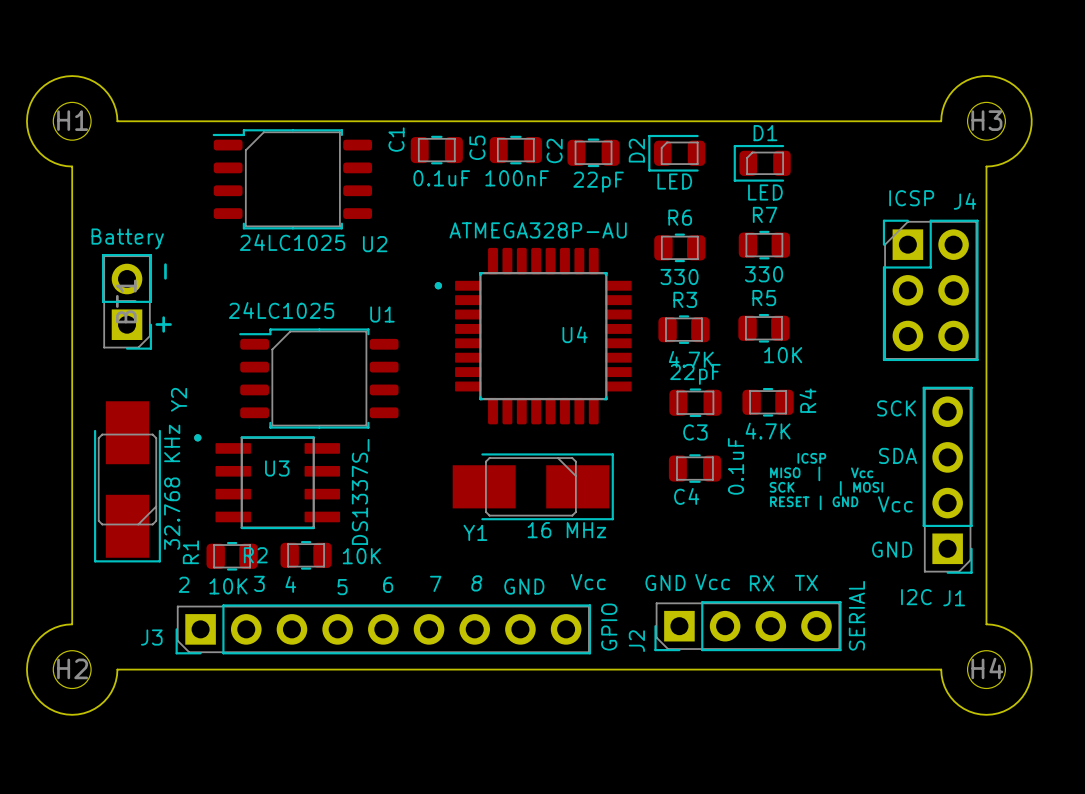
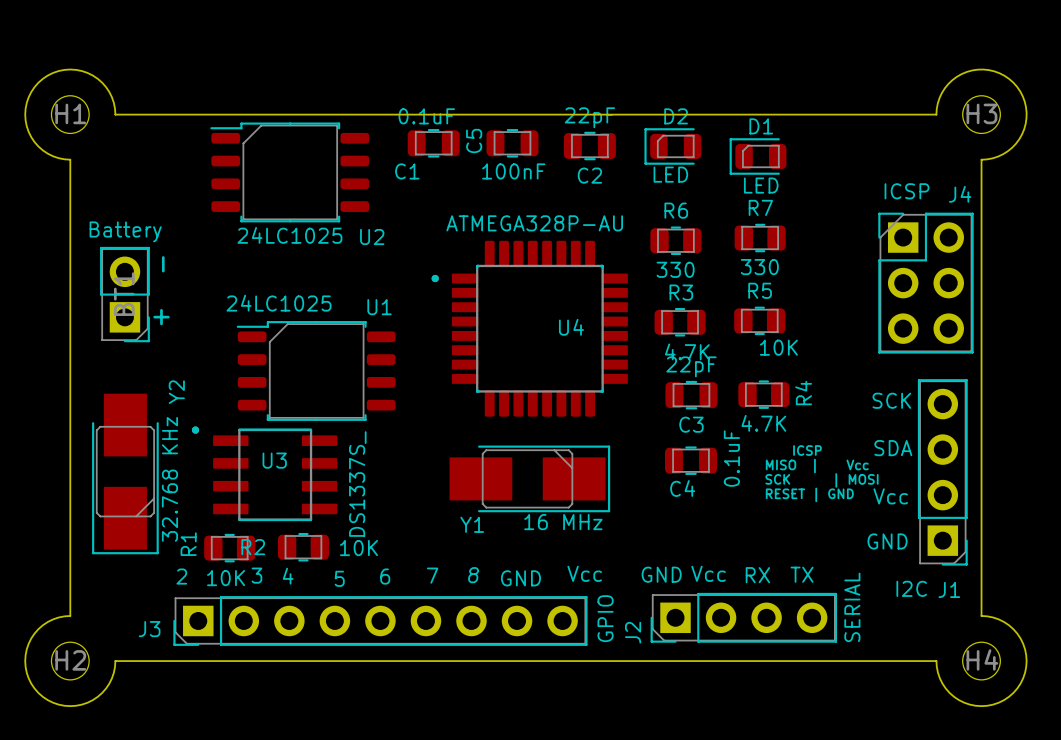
C1 name rotation: 0° (396, 139) -> 90° clockwise (407, 171)
C1 name position: C1 (396, 139) -> C1 (407, 171)
C2 name rotation: 0° (554, 150) -> 90° clockwise (589, 175)
C2 name position: C2 (554, 150) -> C2 (589, 175)
D2 name rotation: 0° (636, 150) -> 90° clockwise (676, 116)
D2 name position: D2 (636, 150) -> D2 (676, 116)
C1 value position: 0.1uF (441, 178) -> 0.1uF (426, 116)
C2 value position: 22pF (598, 182) -> 22pF (589, 117)

